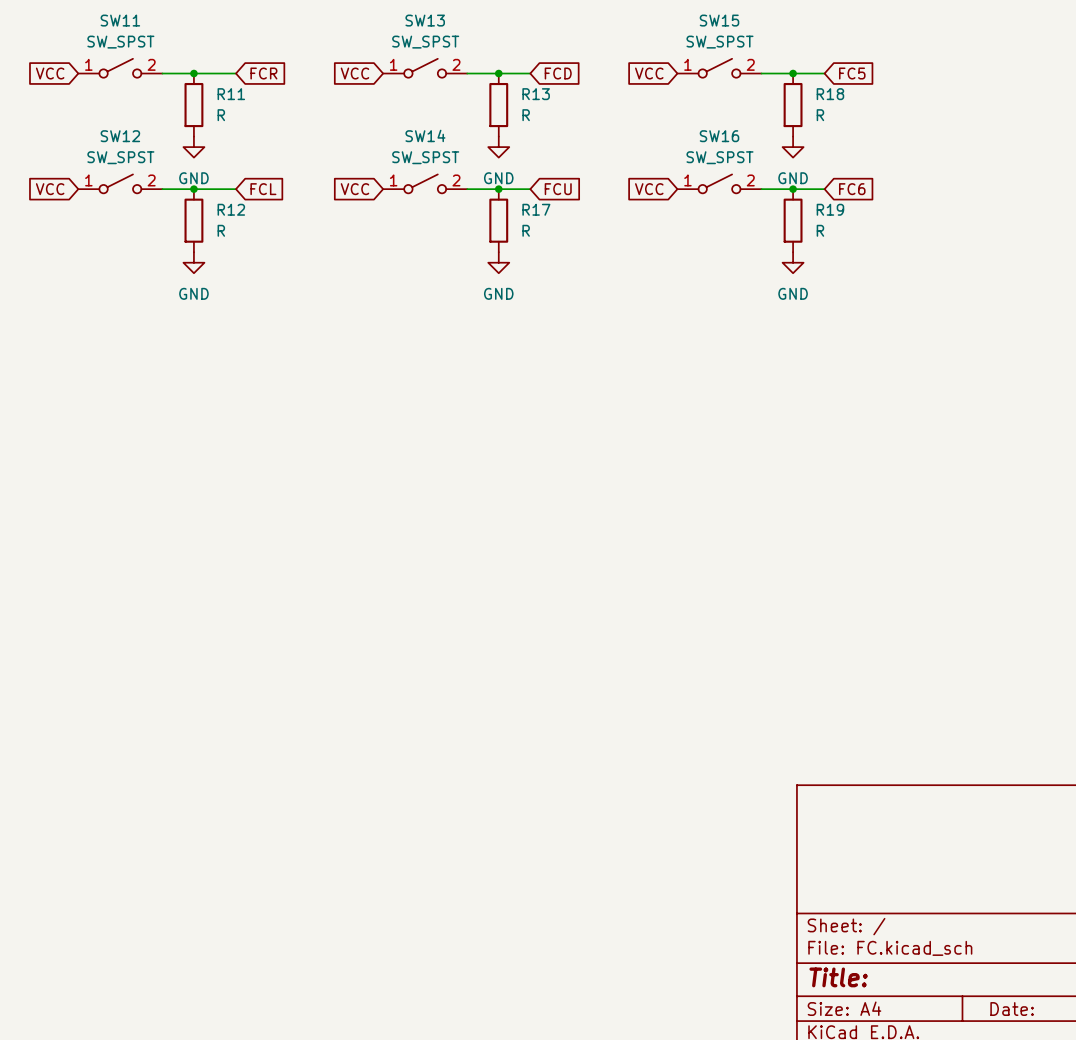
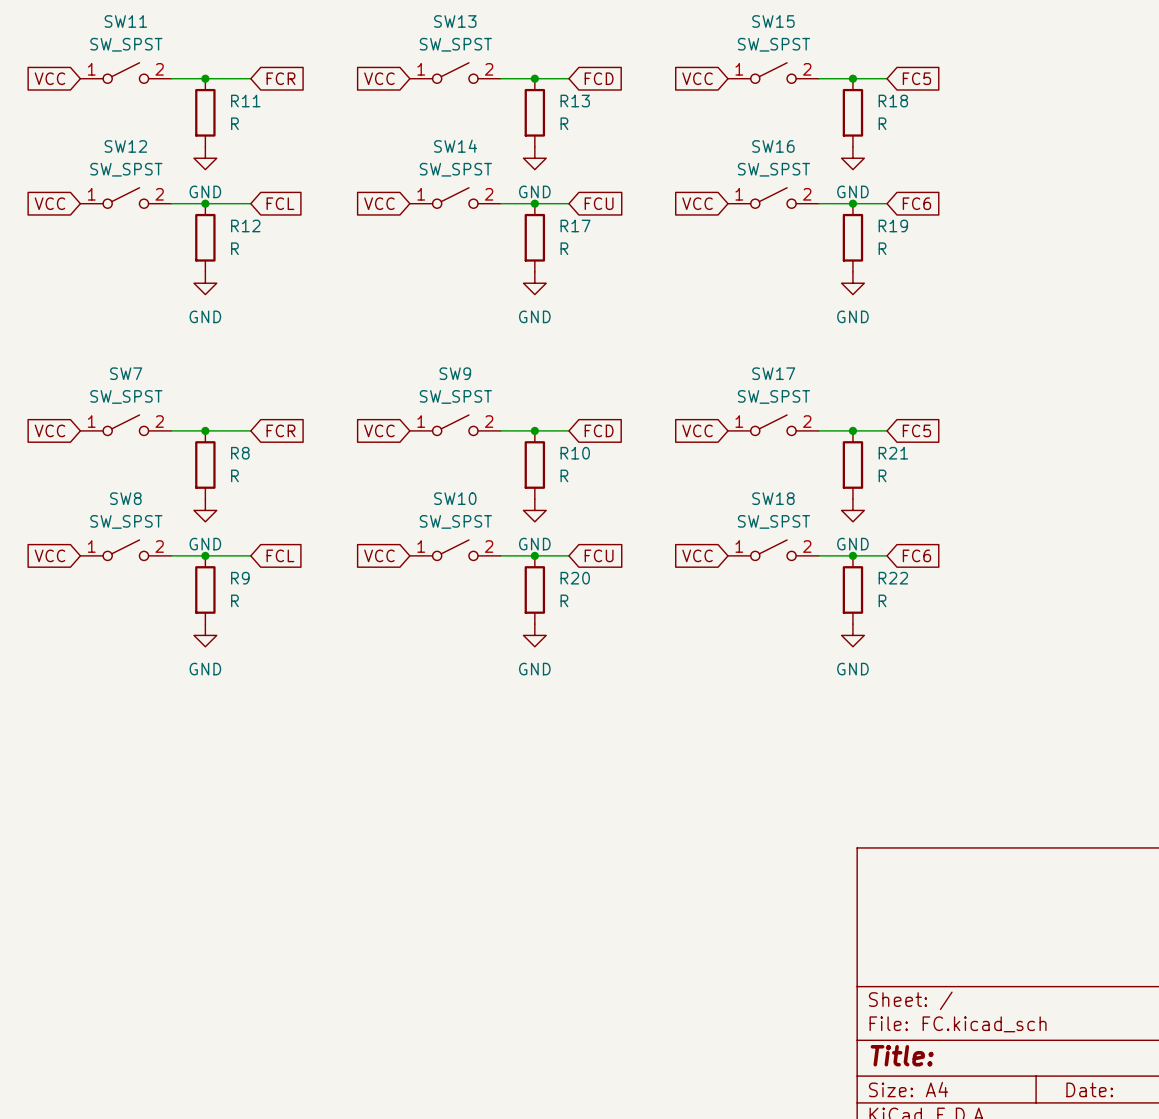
SW7: none -> SW_SPST (125, 425)
SW9: none -> SW_SPST (455, 425)
SW17: none -> SW_SPST (773, 425)
global label: none -> VCC (49, 430)
wire: none -> (171, 430) (250, 430)
junction: none -> (205, 430)
global label: none -> FCR (280, 430)
global label: none -> VCC (379, 430)
wire: none -> (500, 430) (568, 430)
junction: none -> (534, 430)
global label: none -> FCD (599, 430)
global label: none -> VCC (697, 430)
wire: none -> (818, 430) (887, 430)
junction: none -> (852, 430)
global label: none -> FC5 (916, 430)
R8: none -> R (205, 465)
R10: none -> R (534, 465)
R21: none -> R (852, 465)
power symbol: none -> GND (205, 510)
power symbol: none -> GND (534, 510)
power symbol: none -> GND (852, 510)
SW8: none -> SW_SPST (125, 550)
SW10: none -> SW_SPST (455, 550)
SW18: none -> SW_SPST (773, 550)
global label: none -> VCC (49, 555)
wire: none -> (171, 555) (250, 555)
junction: none -> (205, 555)
global label: none -> FCL (280, 555)
global label: none -> VCC (379, 555)
wire: none -> (500, 555) (568, 555)
junction: none -> (534, 555)
global label: none -> FCU (599, 555)
global label: none -> VCC (697, 555)
wire: none -> (818, 555) (887, 555)
junction: none -> (852, 555)
global label: none -> FC6 (916, 555)
R9: none -> R (205, 589)
R20: none -> R (534, 589)
R22: none -> R (852, 589)
power symbol: none -> GND (205, 635)
power symbol: none -> GND (534, 635)
power symbol: none -> GND (852, 635)

